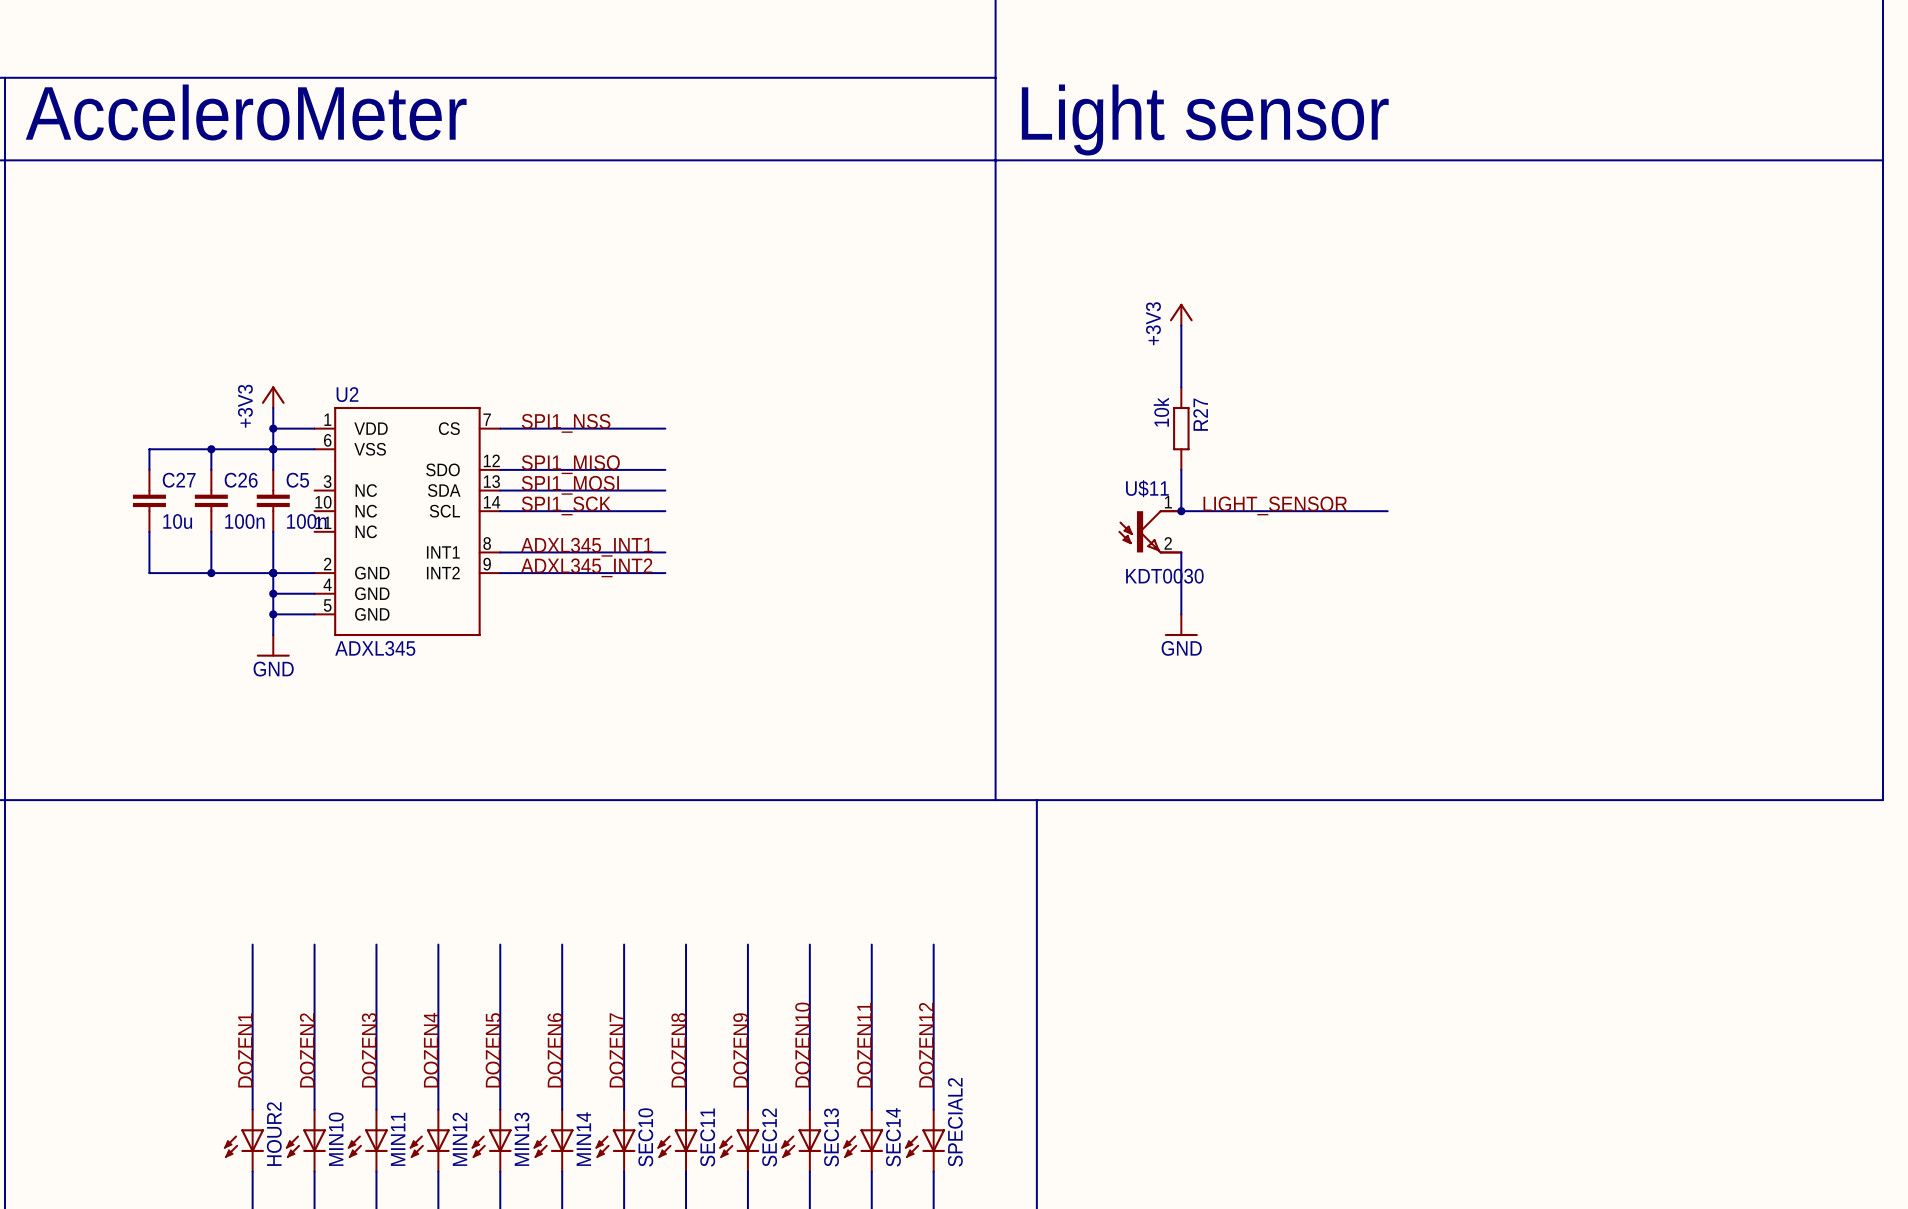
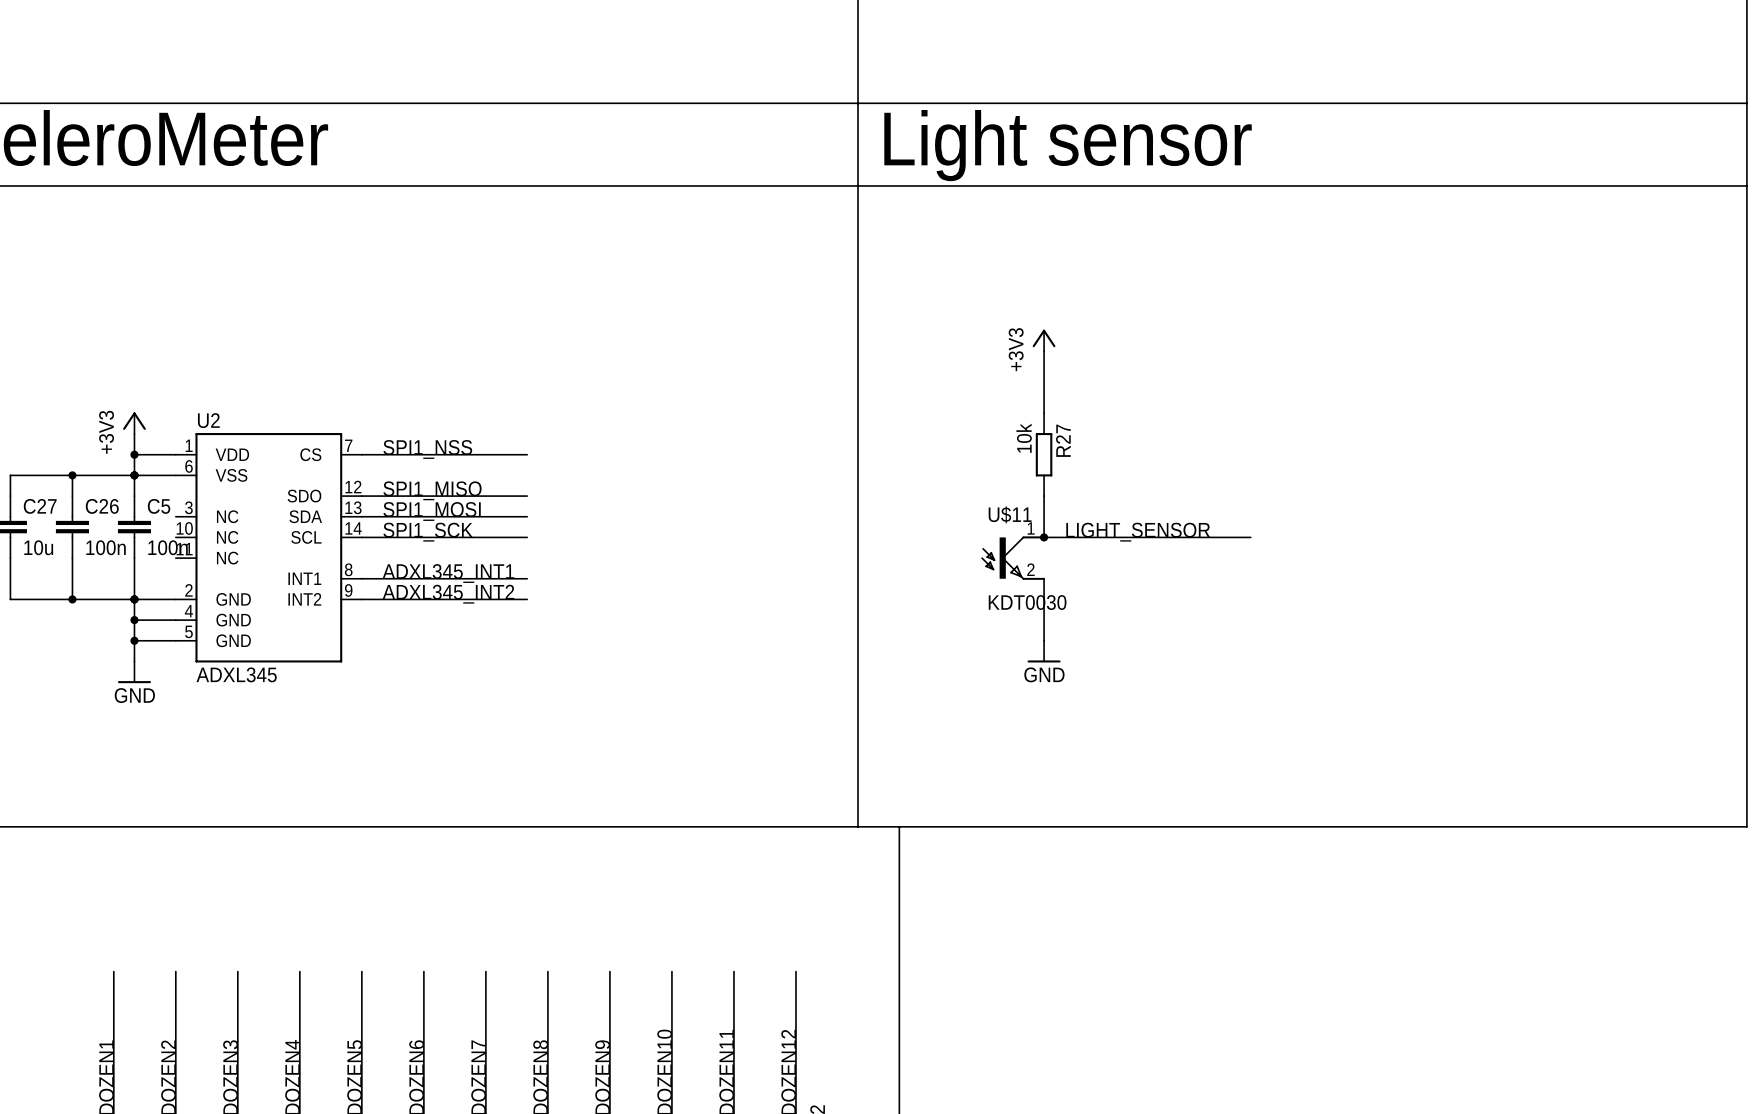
line: none -> (858, 103) (1746, 103)

